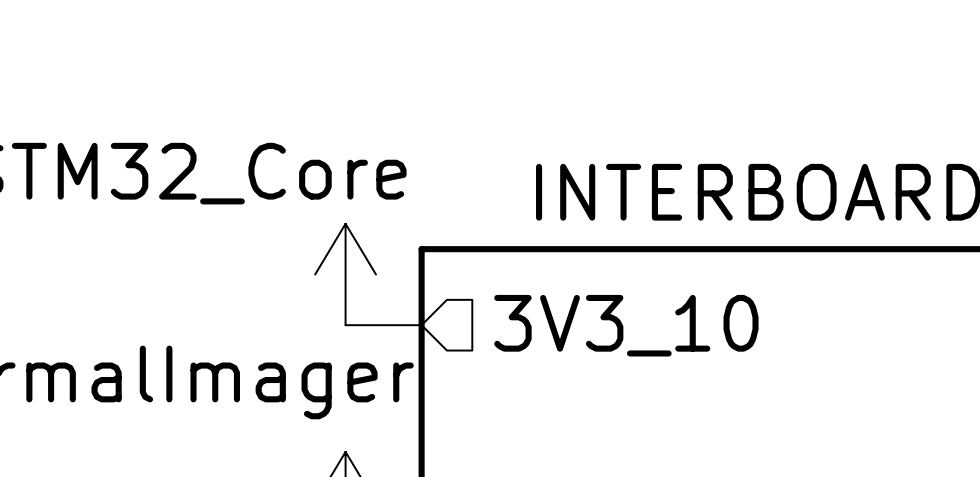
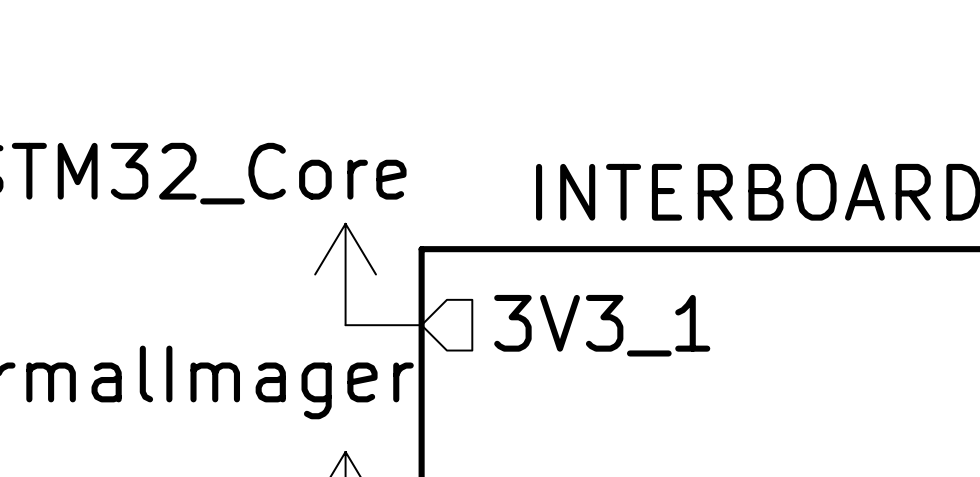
sheet pin: 3V3_10 (626, 325) -> 3V3_1 (602, 325)

